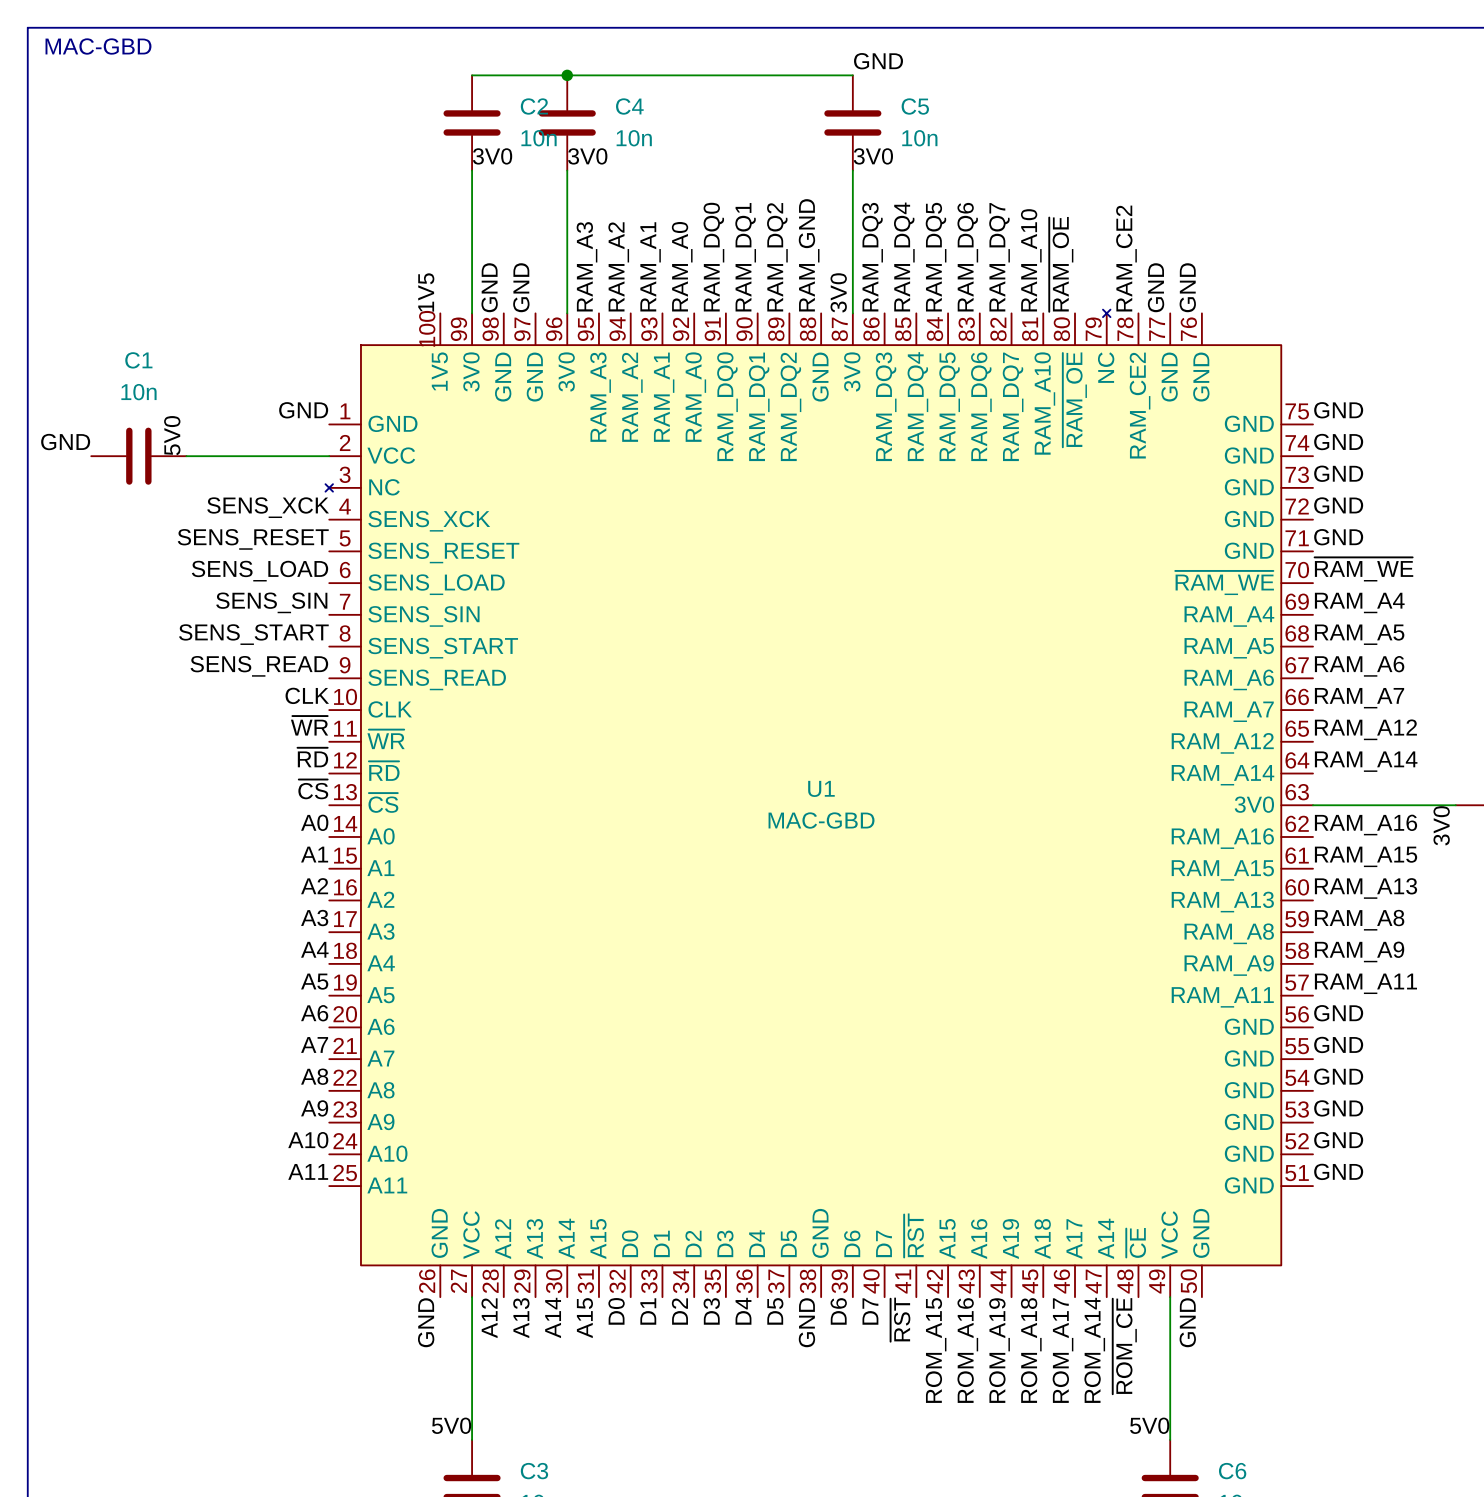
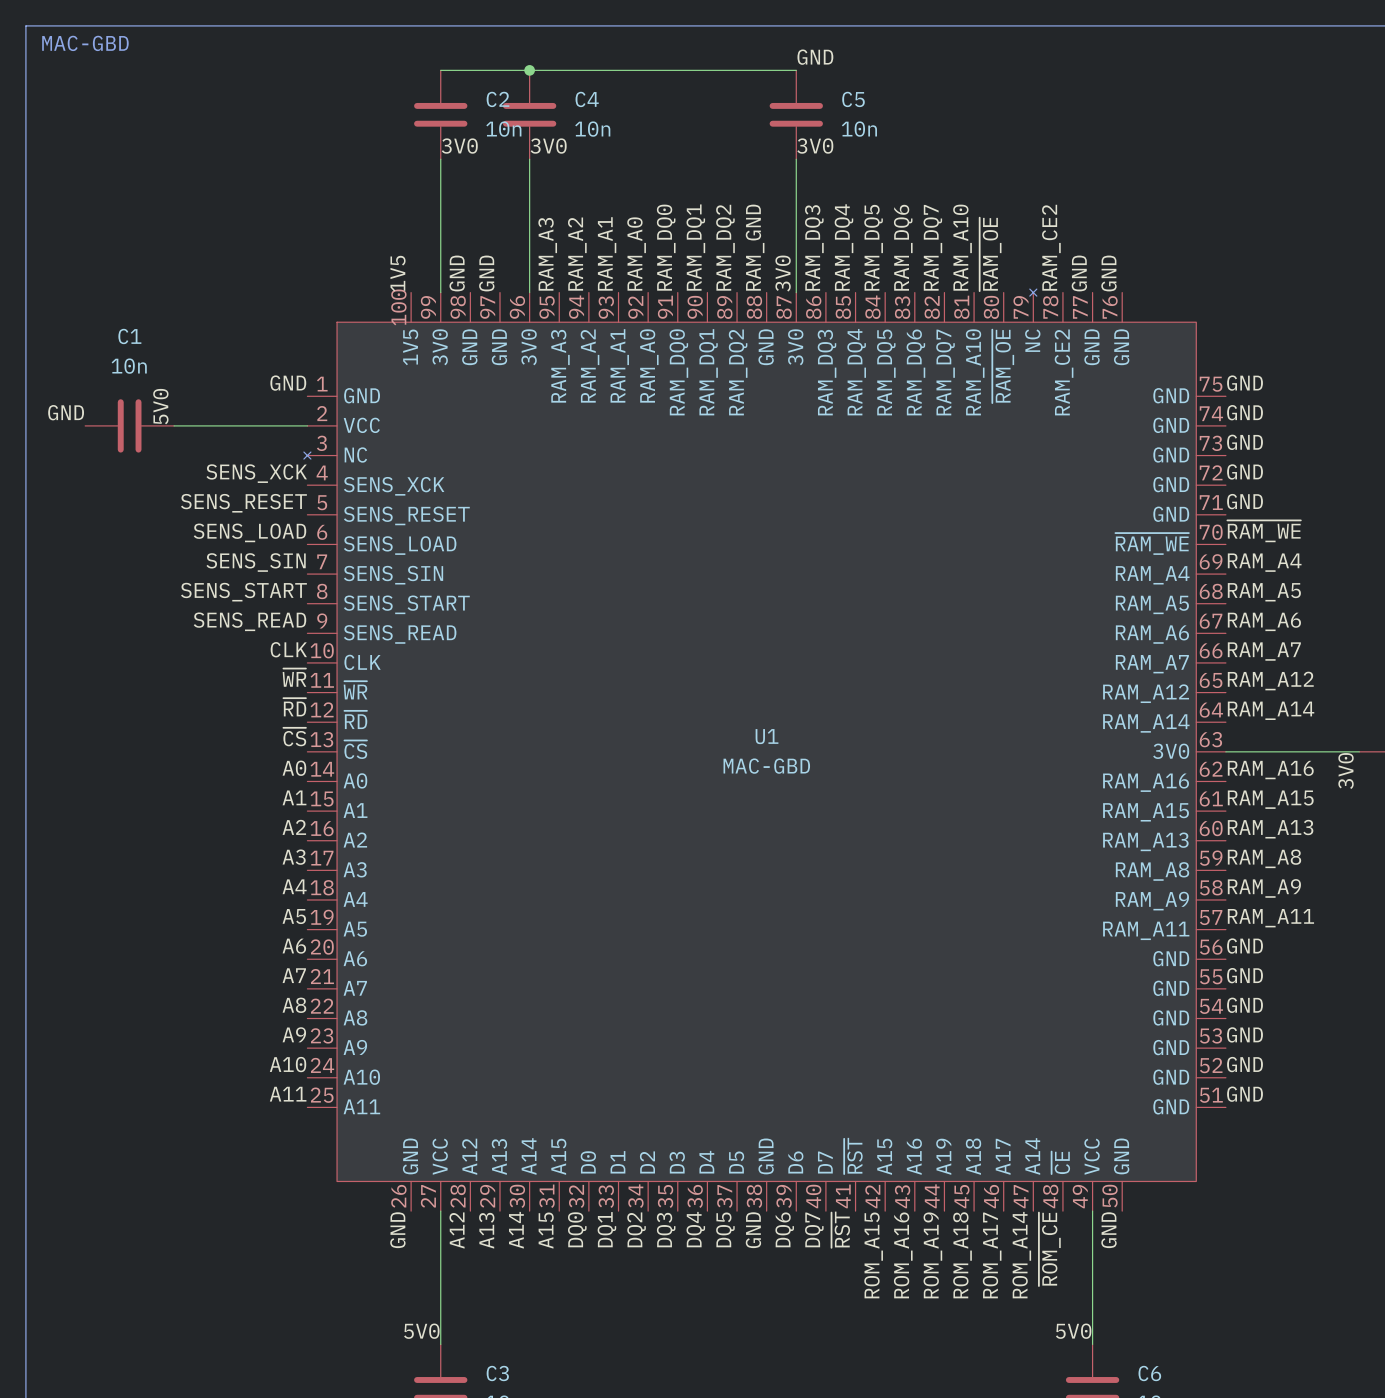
label: D0 (616, 1311) -> DQ0 (577, 1229)
label: D1 (648, 1311) -> DQ1 (606, 1229)
label: D2 (679, 1311) -> DQ2 (636, 1229)
label: D3 (711, 1311) -> DQ3 (666, 1230)
label: D4 (743, 1311) -> DQ4 (695, 1229)
label: D5 (775, 1311) -> DQ5 (725, 1229)
label: D6 (838, 1311) -> DQ6 (784, 1229)
label: D7 (870, 1311) -> DQ7 (814, 1229)

